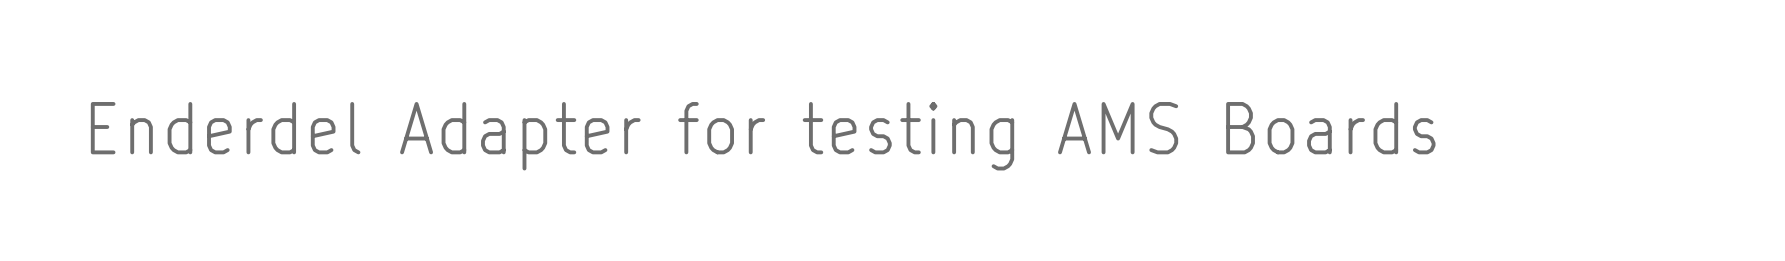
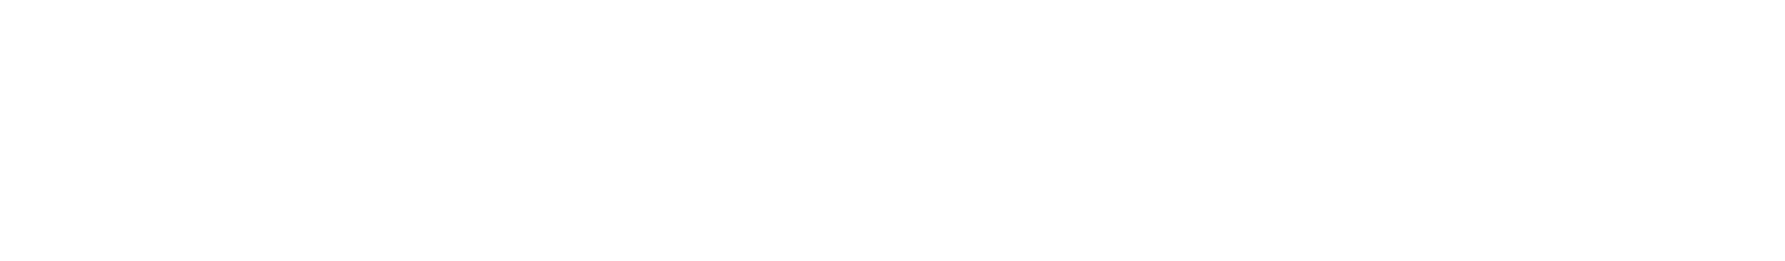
text: Enderdel Adapter for testing AMS Boards (763, 136) -> none

